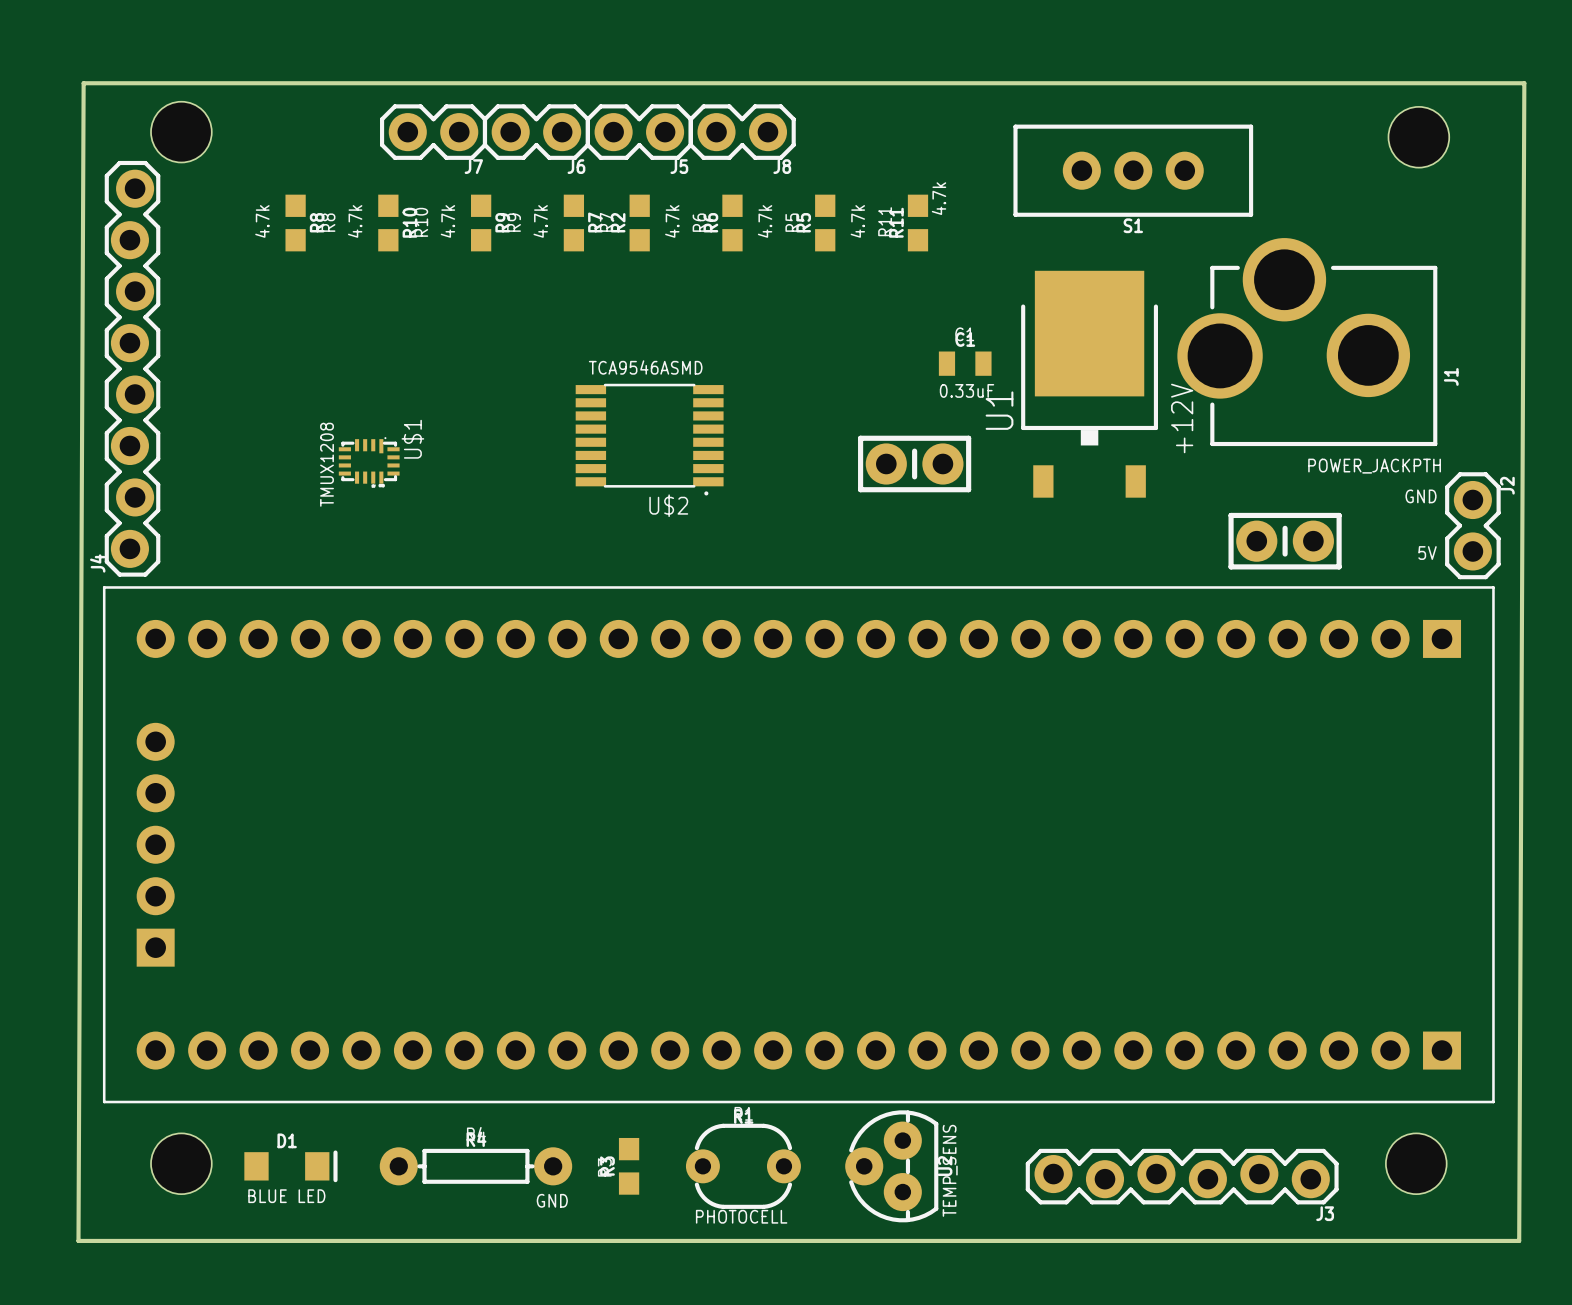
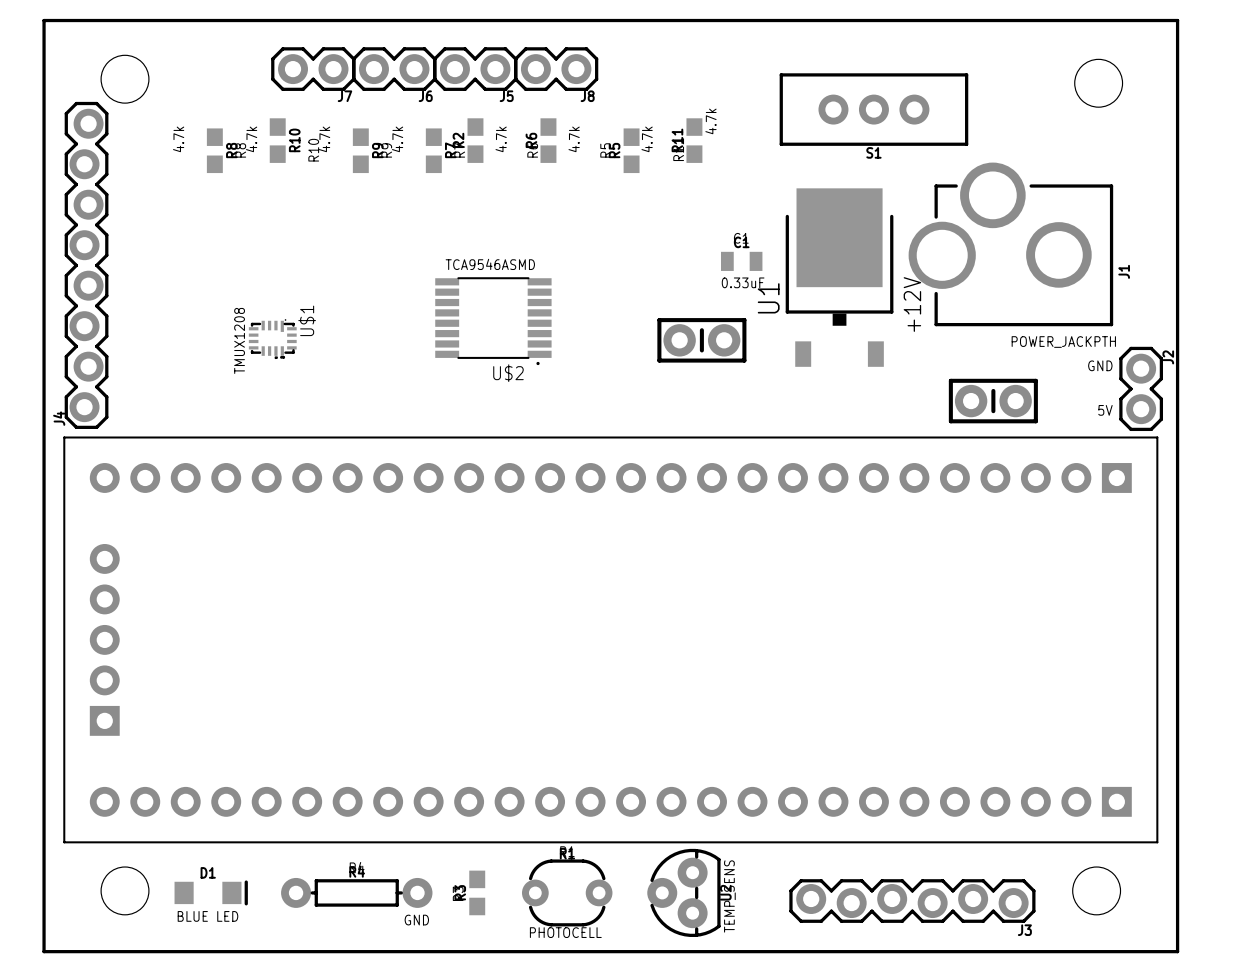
J7 position: (433, 132) -> (313, 69)
J6 position: (536, 132) -> (394, 69)
J5 position: (639, 132) -> (475, 69)
J8 position: (742, 132) -> (556, 69)
text position: 4.7k (939, 198) -> 4.7k (710, 121)
text position: 4.7k (262, 221) -> 4.7k (178, 139)
text position: 4.7k (355, 221) -> 4.7k (251, 139)
text position: 4.7k (447, 221) -> 4.7k (324, 139)
text position: 4.7k (540, 221) -> 4.7k (397, 139)
text position: 4.7k (672, 221) -> 4.7k (501, 139)
text position: 4.7k (765, 221) -> 4.7k (574, 139)
text position: 4.7k (857, 221) -> 4.7k (647, 139)
R10 position: (388, 223) -> (277, 140)
R2 position: (639, 223) -> (475, 140)
R6 position: (732, 223) -> (548, 140)
R11 position: (917, 223) -> (694, 140)
board edge: (78, 1240) (83, 83) (1524, 83) (1519, 1240) -> (44, 951) (44, 20) (1177, 20) (1177, 951)

